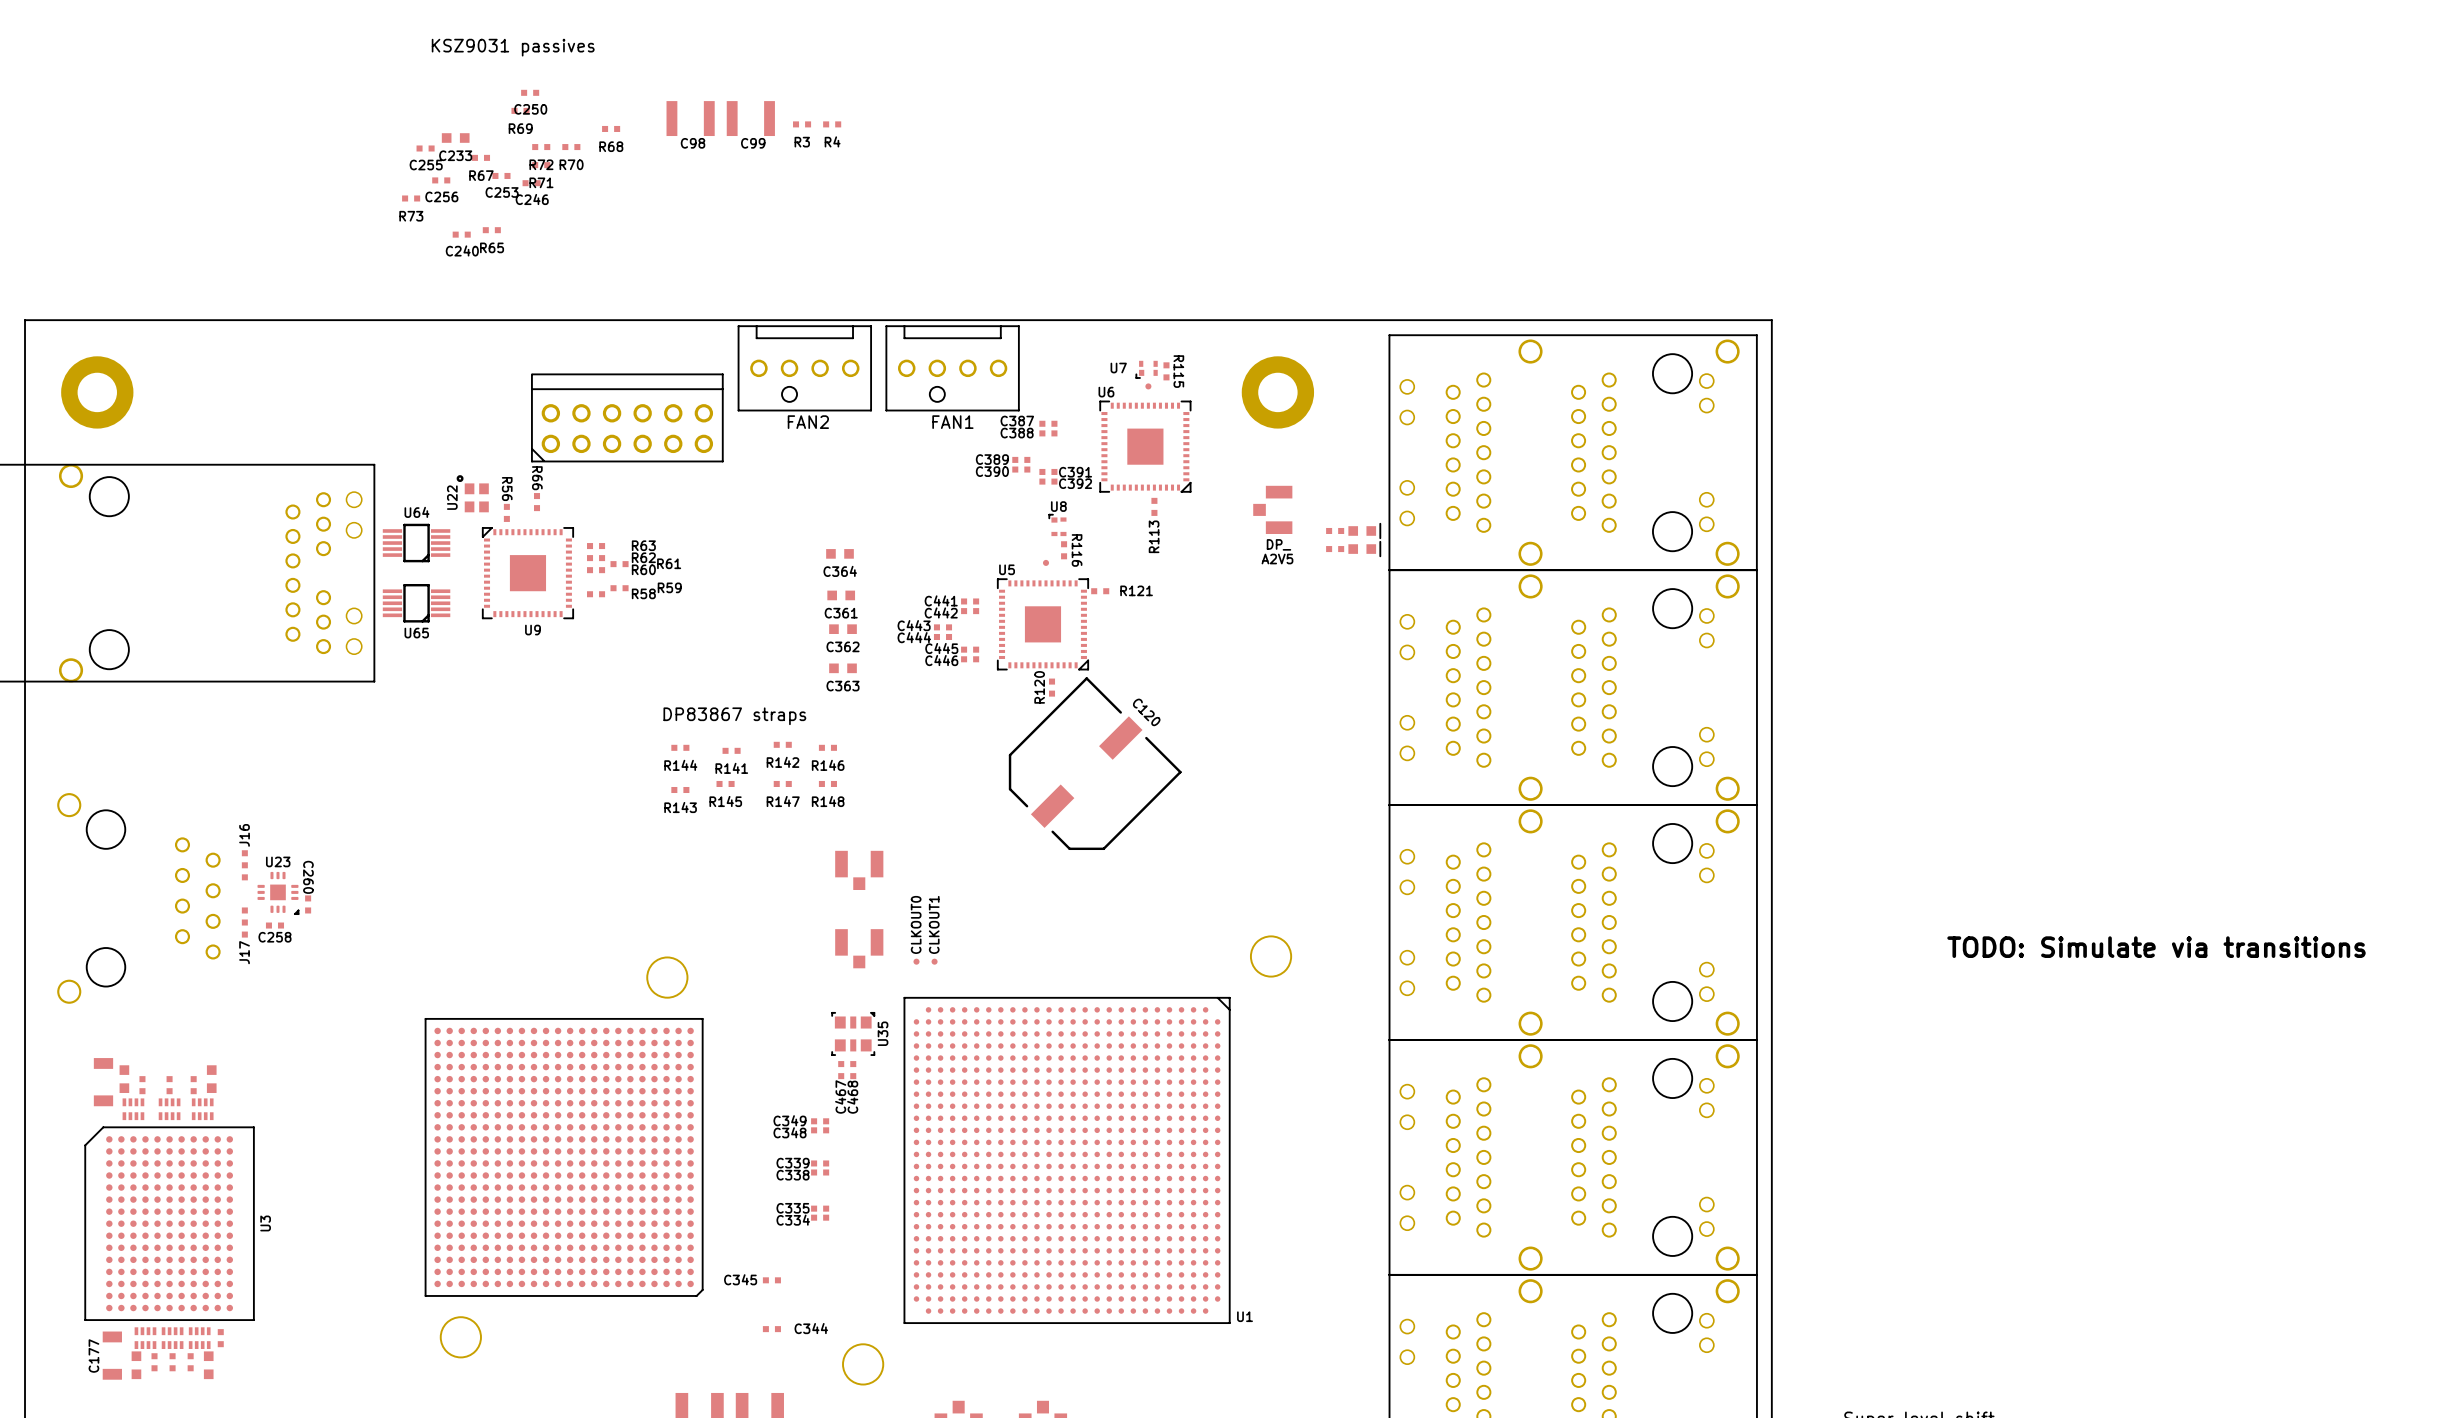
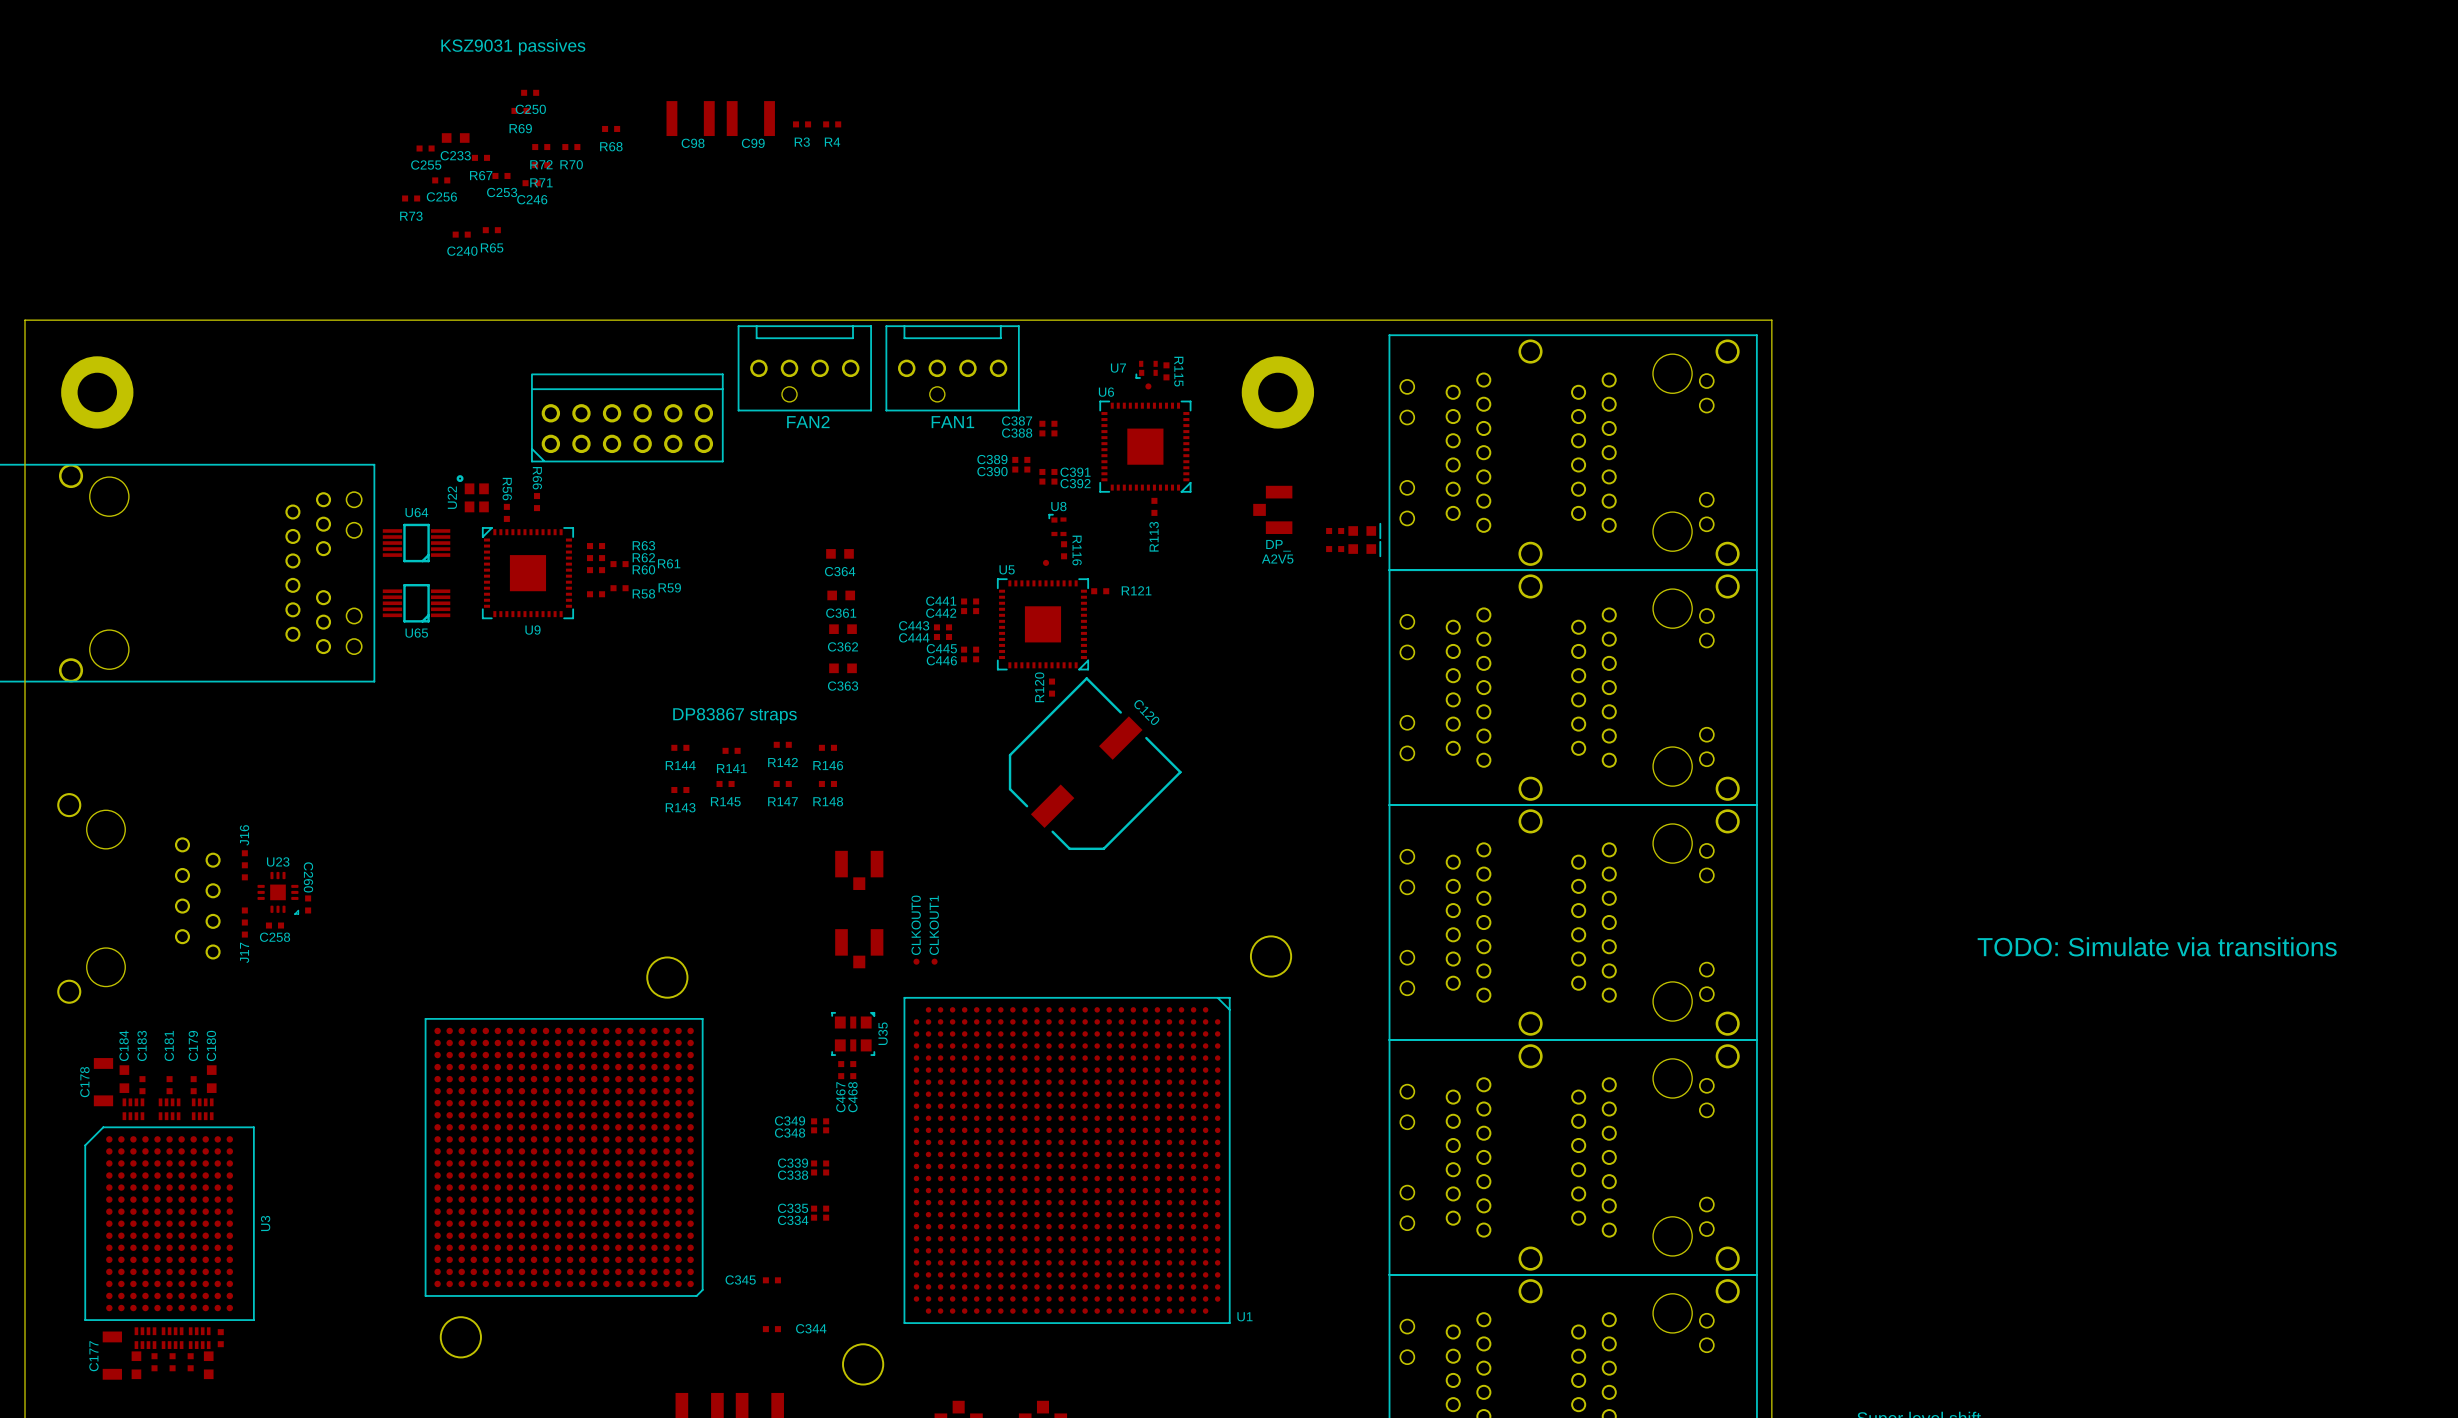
C184 name: none -> C184 (124, 1045)
C183 name: none -> C183 (142, 1045)
C181 name: none -> C181 (169, 1045)
C179 name: none -> C179 (193, 1045)
C180 name: none -> C180 (211, 1045)
C178 name: none -> C178 (84, 1082)

